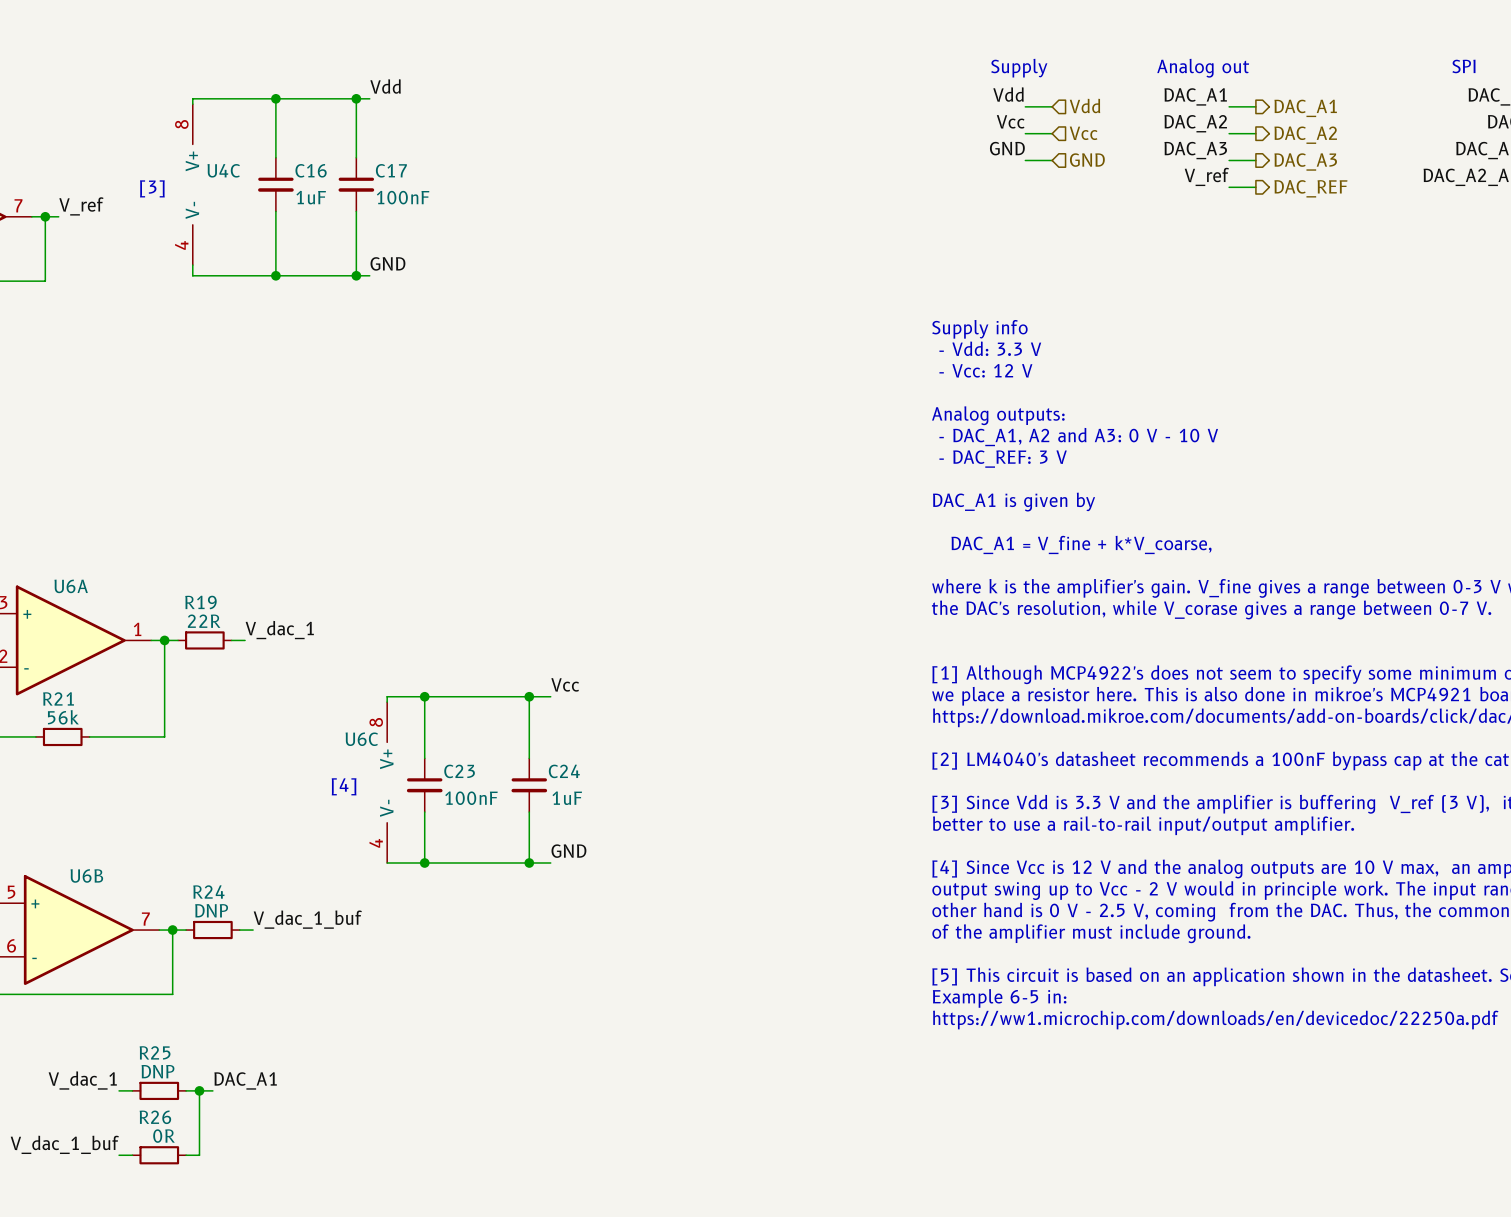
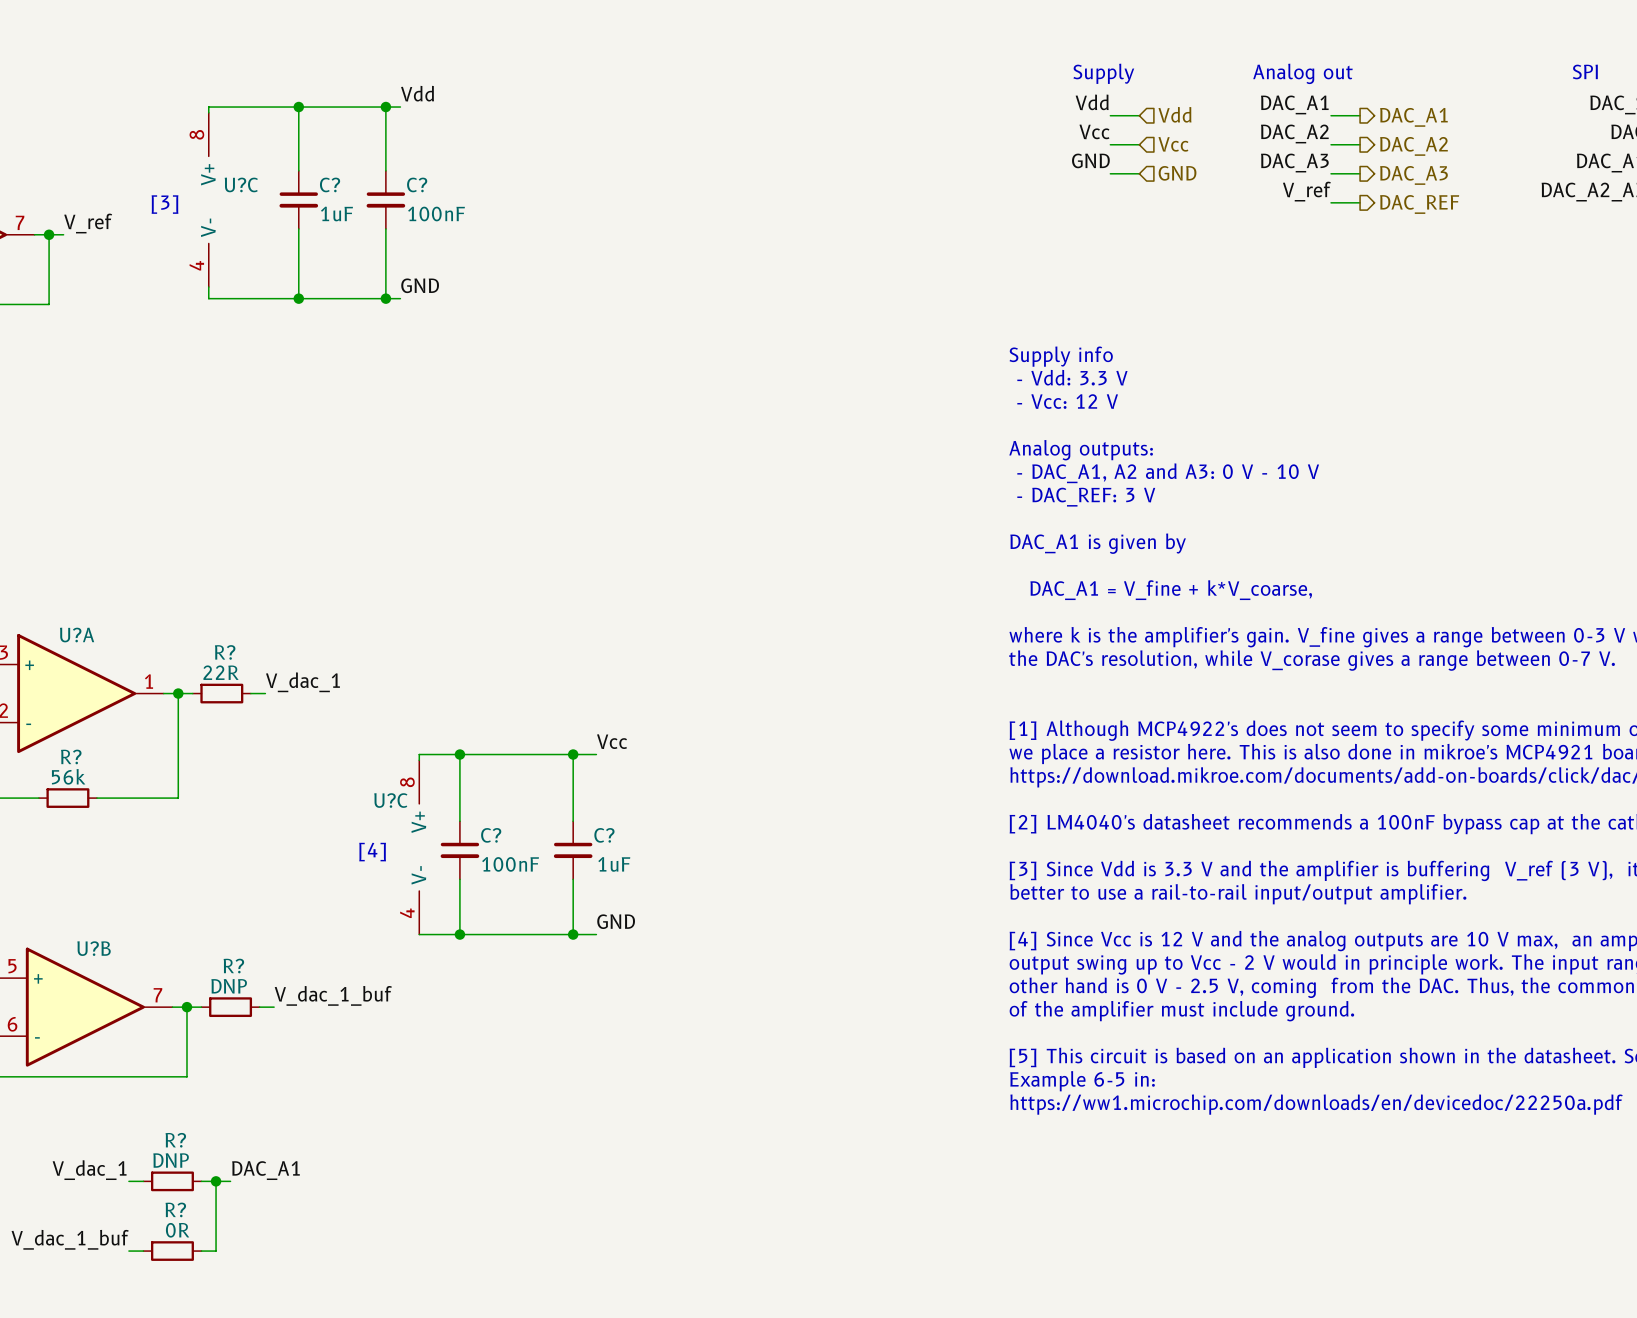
U4C name: U4C (223, 170) -> U?C (241, 184)
C16 name: C16 (311, 170) -> C? (330, 184)
C17 name: C17 (391, 170) -> C? (417, 184)
U6A name: U6A (71, 586) -> U?A (77, 635)
R19 name: R19 (200, 602) -> R? (225, 652)
R21 name: R21 (58, 698) -> R? (71, 756)
U6C name: U6C (361, 739) -> U?C (390, 800)
C23 name: C23 (459, 771) -> C? (491, 835)
C24 name: C24 (564, 771) -> C? (604, 835)
U6B name: U6B (86, 875) -> U?B (94, 948)
R24 name: R24 (208, 891) -> R? (233, 966)
R25 name: R25 (155, 1052) -> R? (175, 1140)
R26 name: R26 (155, 1117) -> R? (175, 1209)

